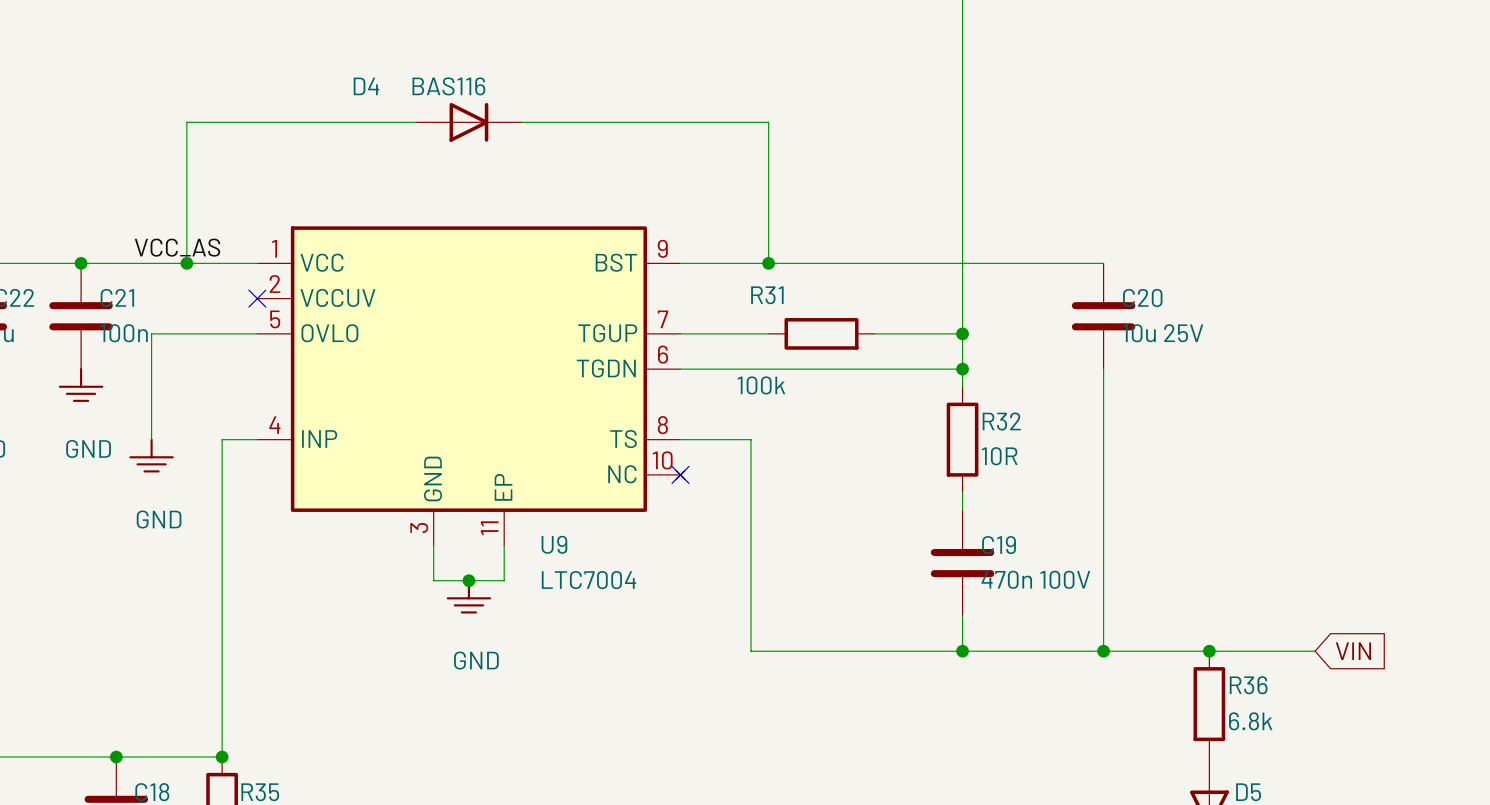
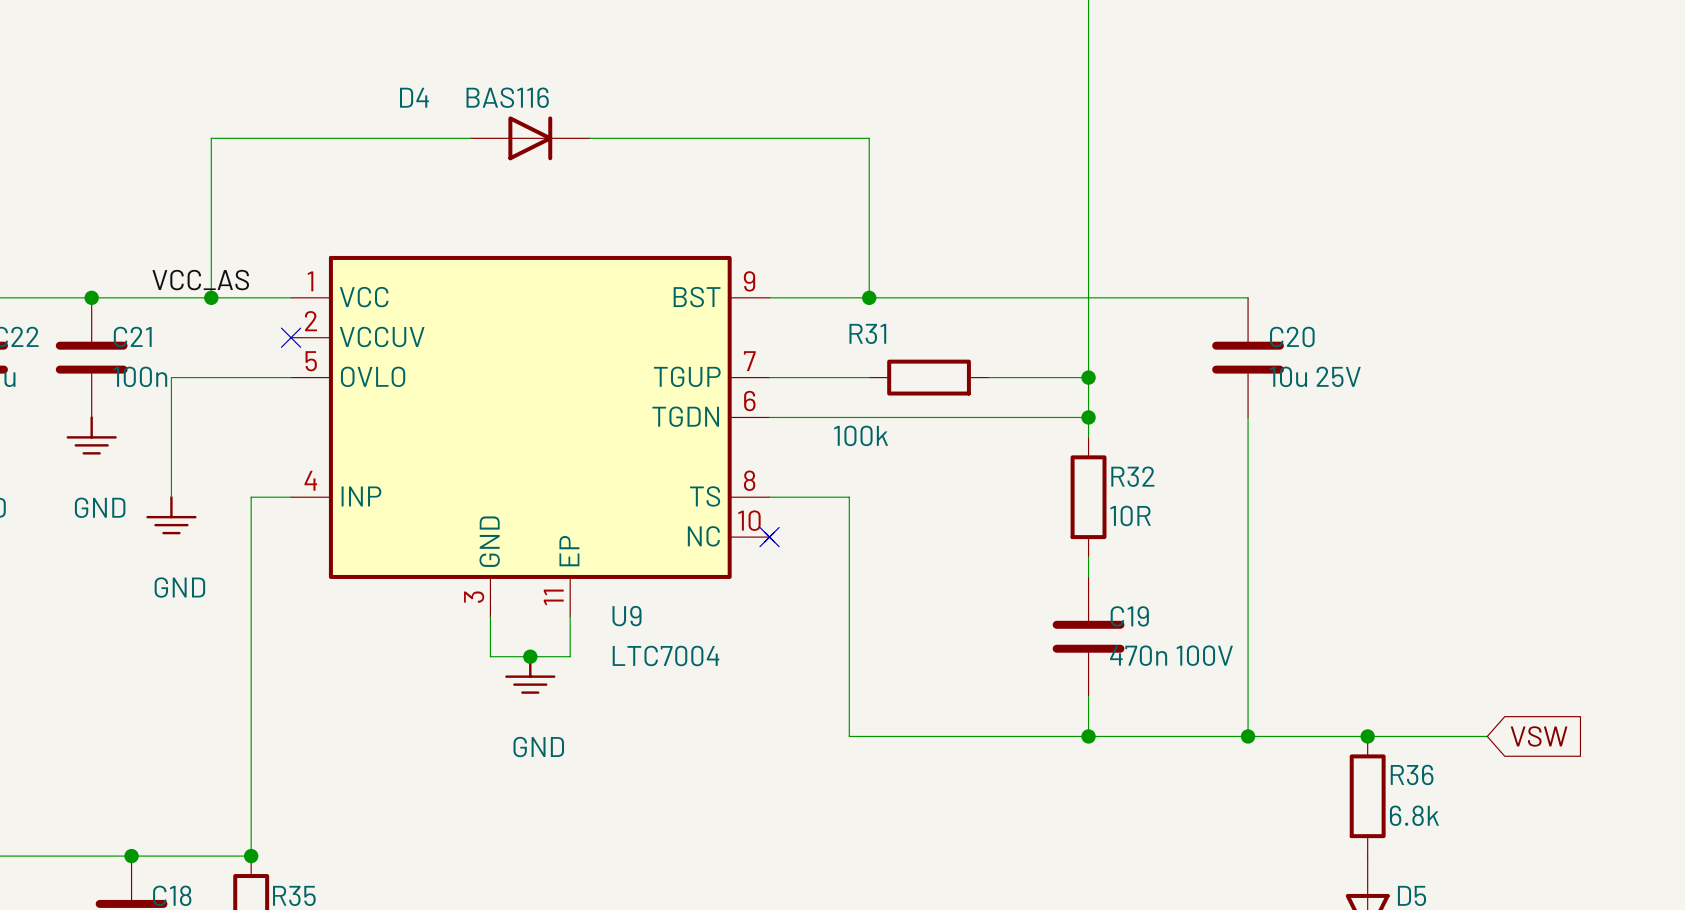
global label: VIN (1353, 651) -> VSW (1539, 736)

